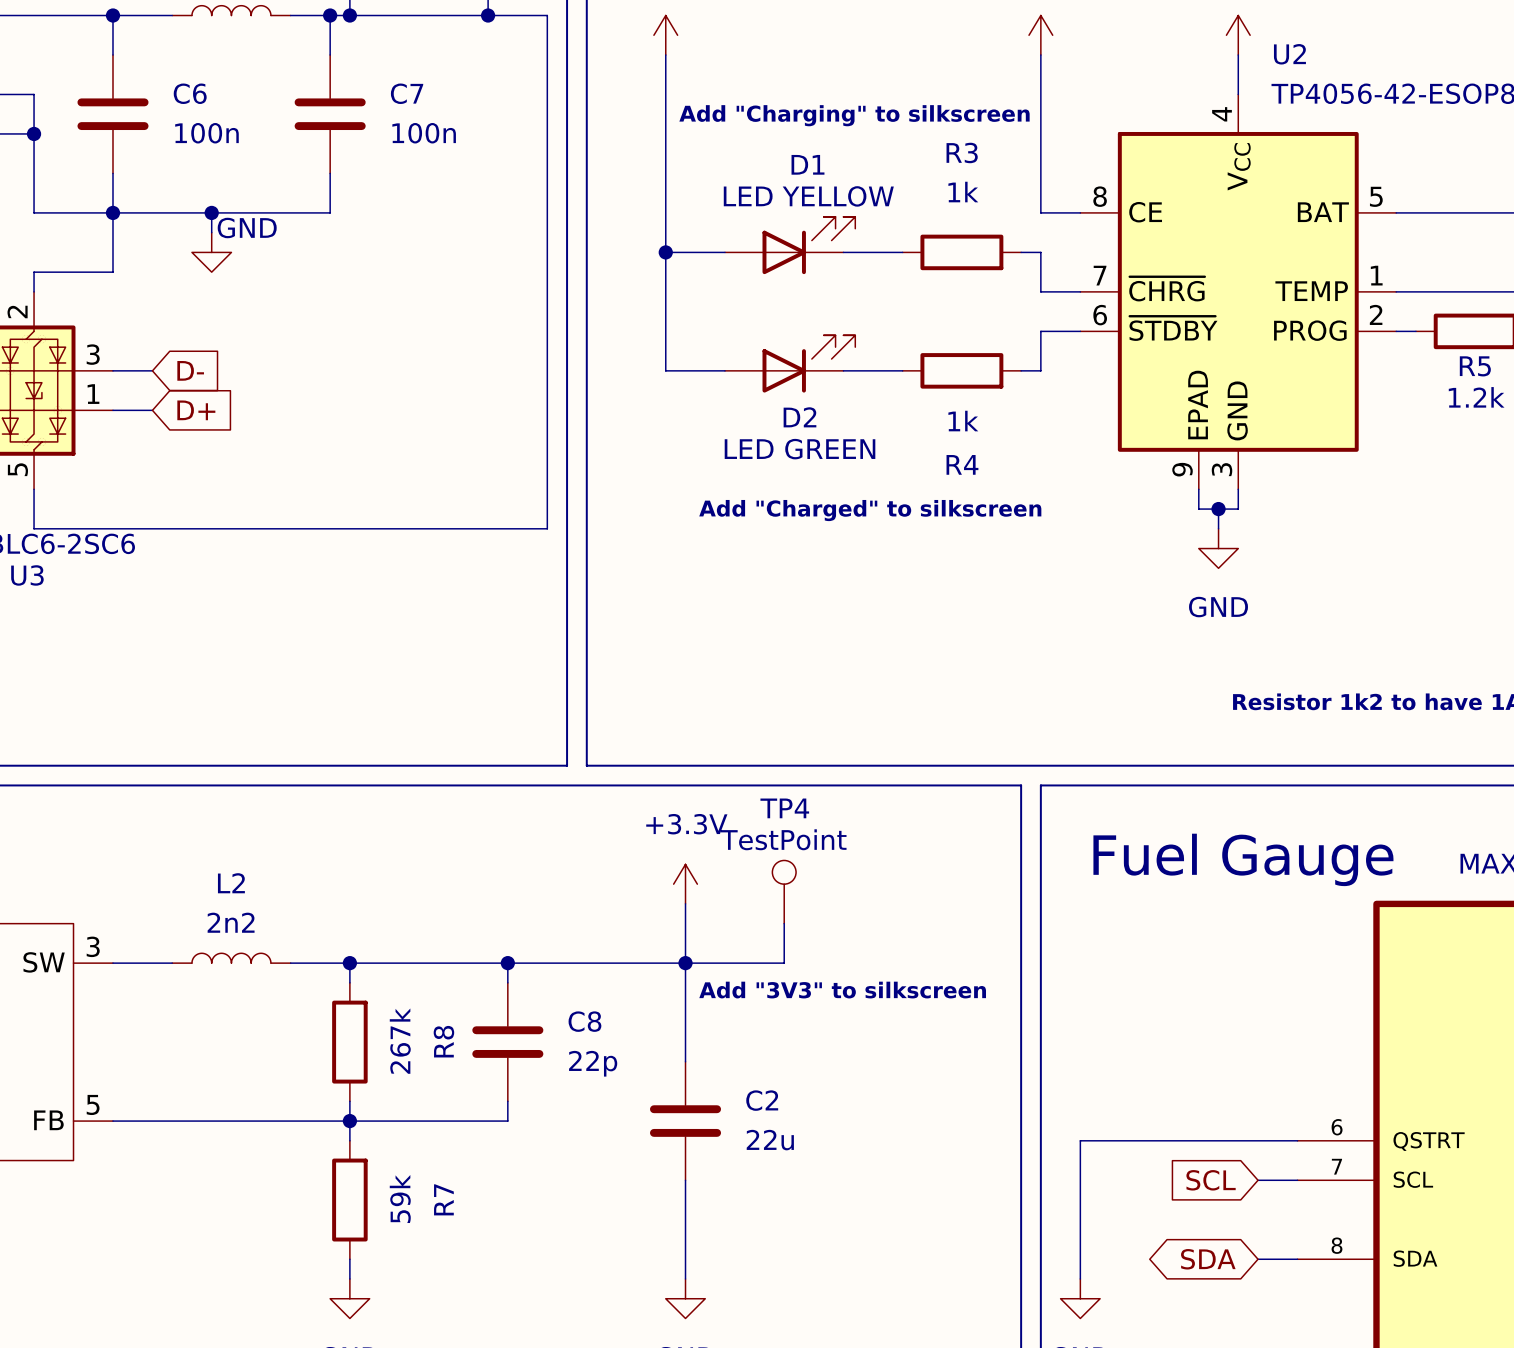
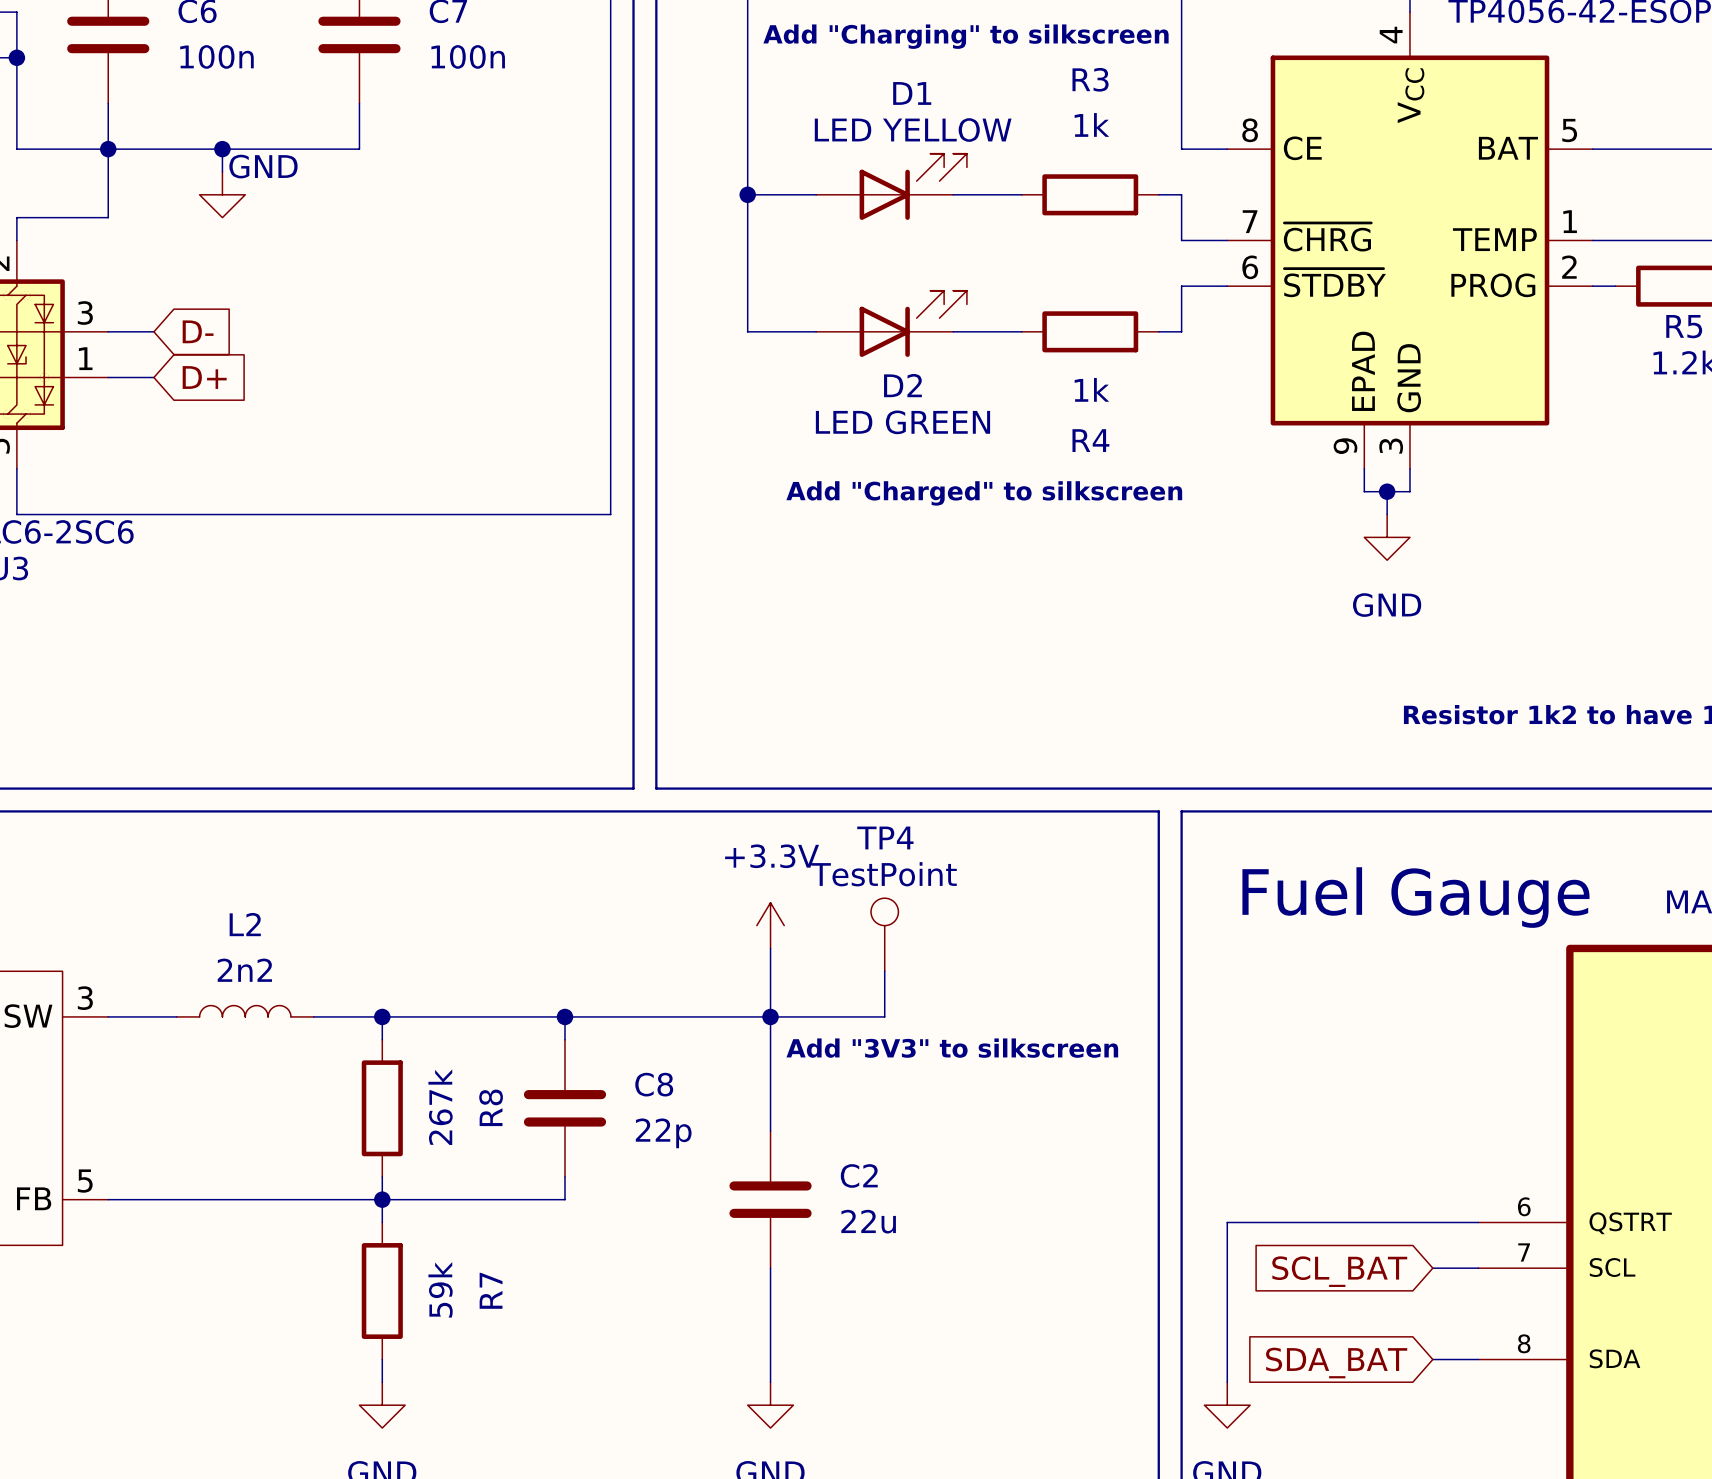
global label: SCL (1211, 1180) -> SCL_BAT (1339, 1271)
global label shape: bidirectional (1208, 1259) -> input (1336, 1363)
global label: SDA (1208, 1259) -> SDA_BAT (1336, 1363)

